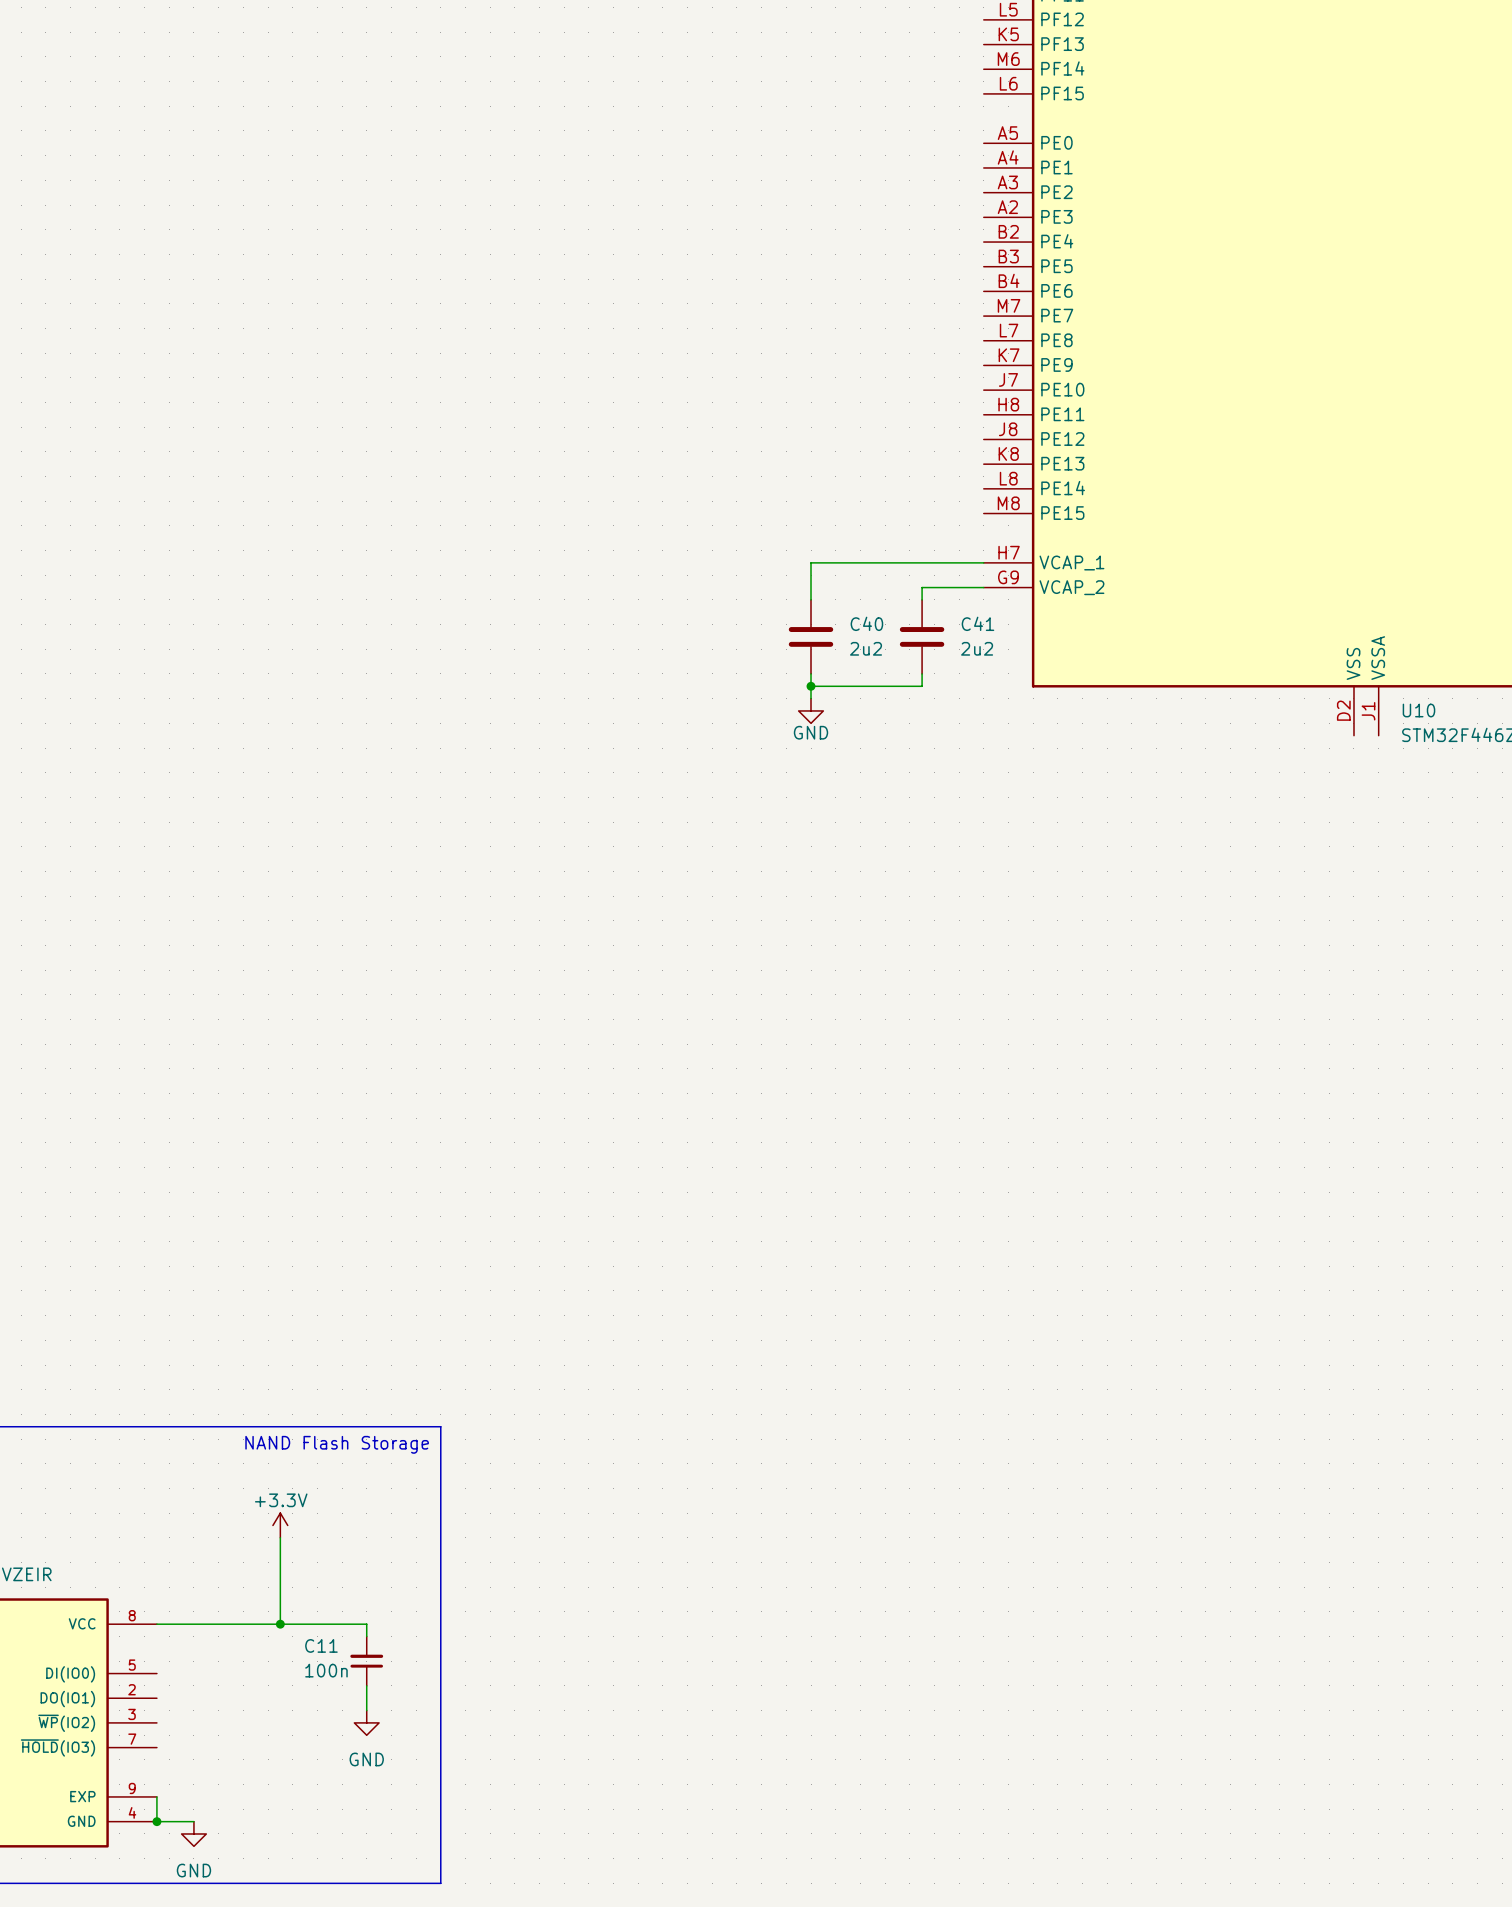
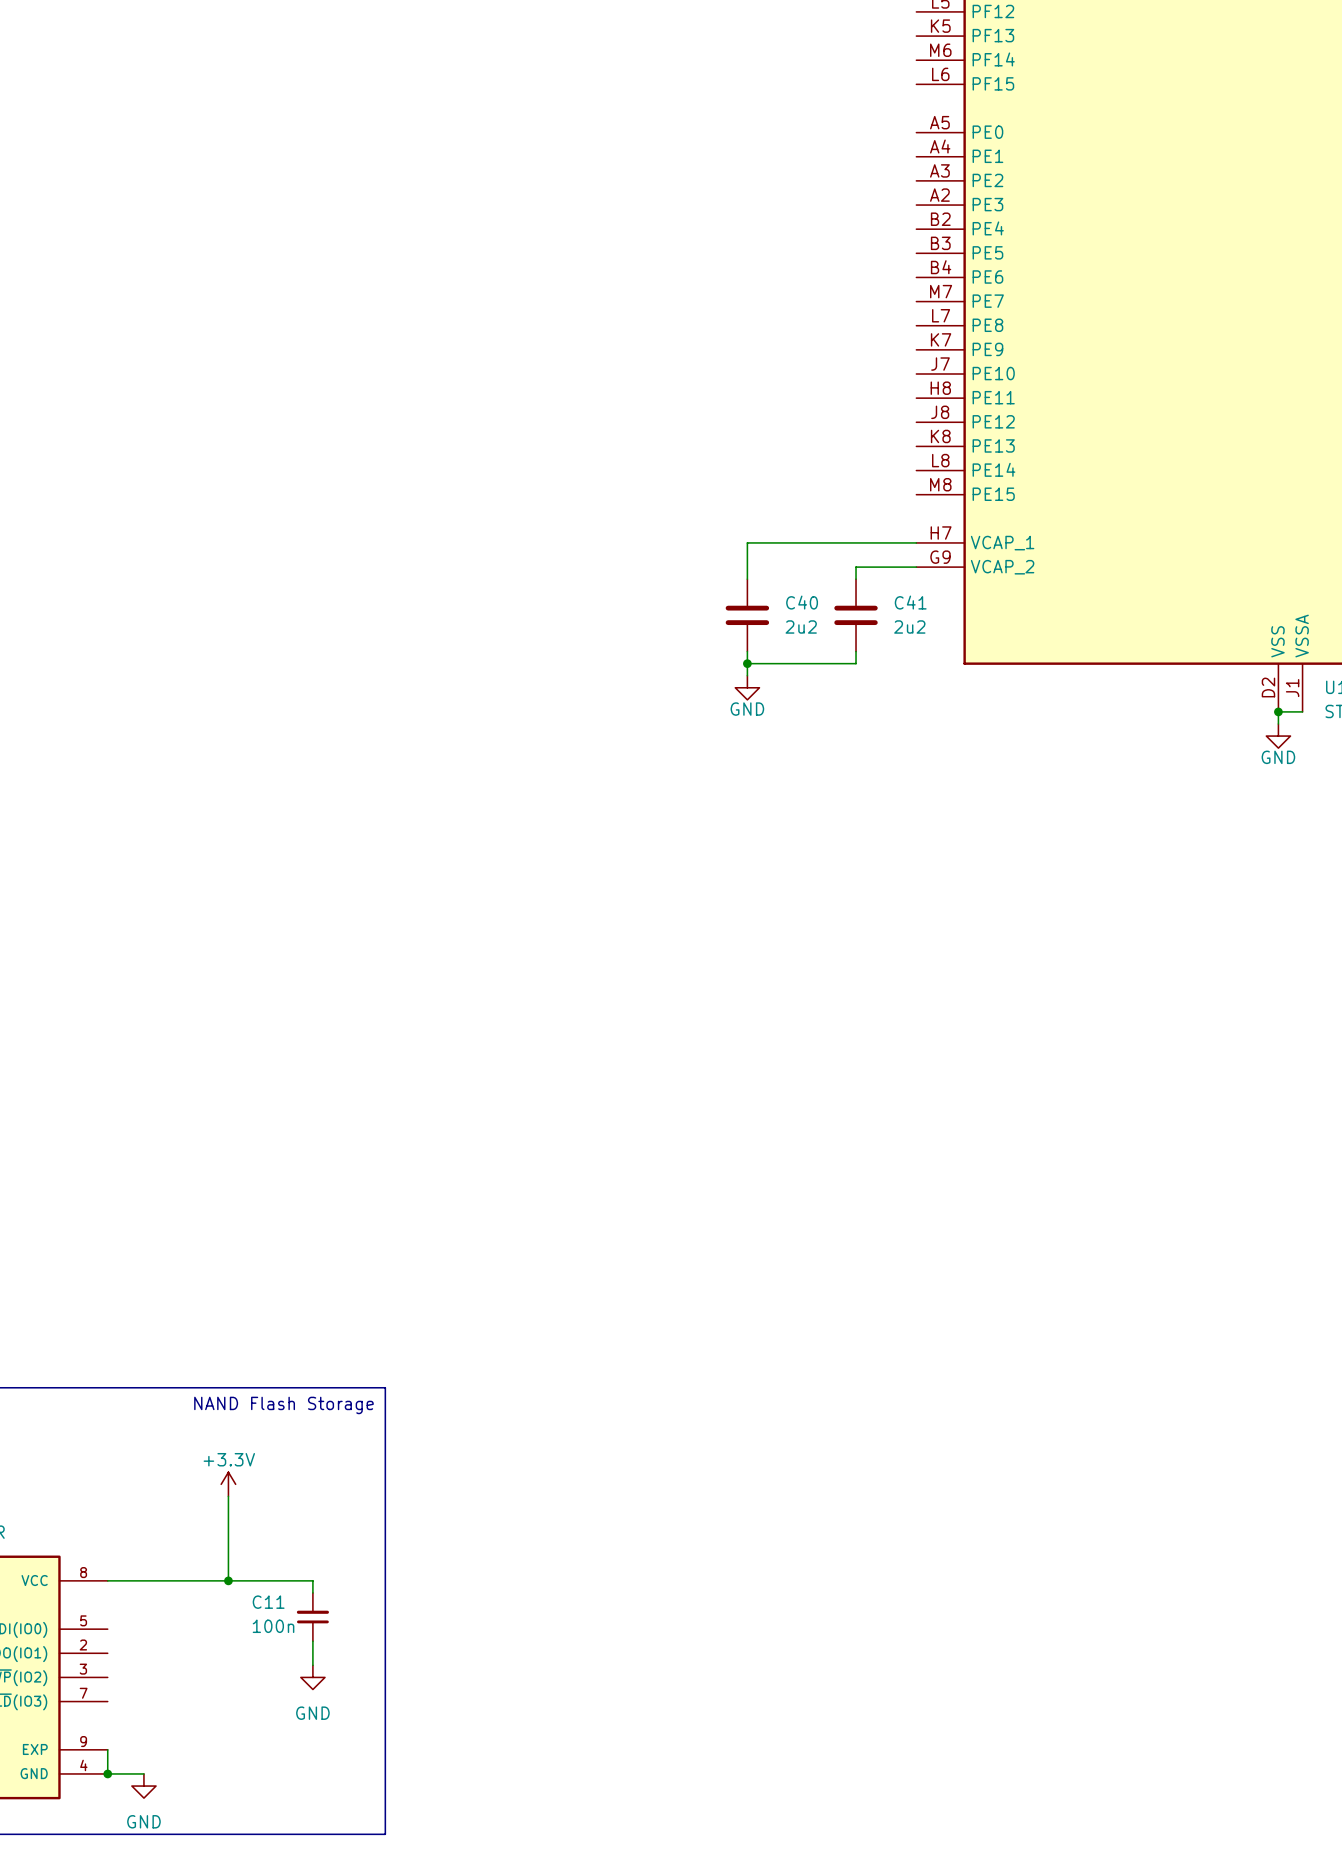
junction: none -> (1278, 711)
wire: none -> (1302, 711) (1278, 711) (1278, 723)
power symbol: none -> GND (1278, 736)

